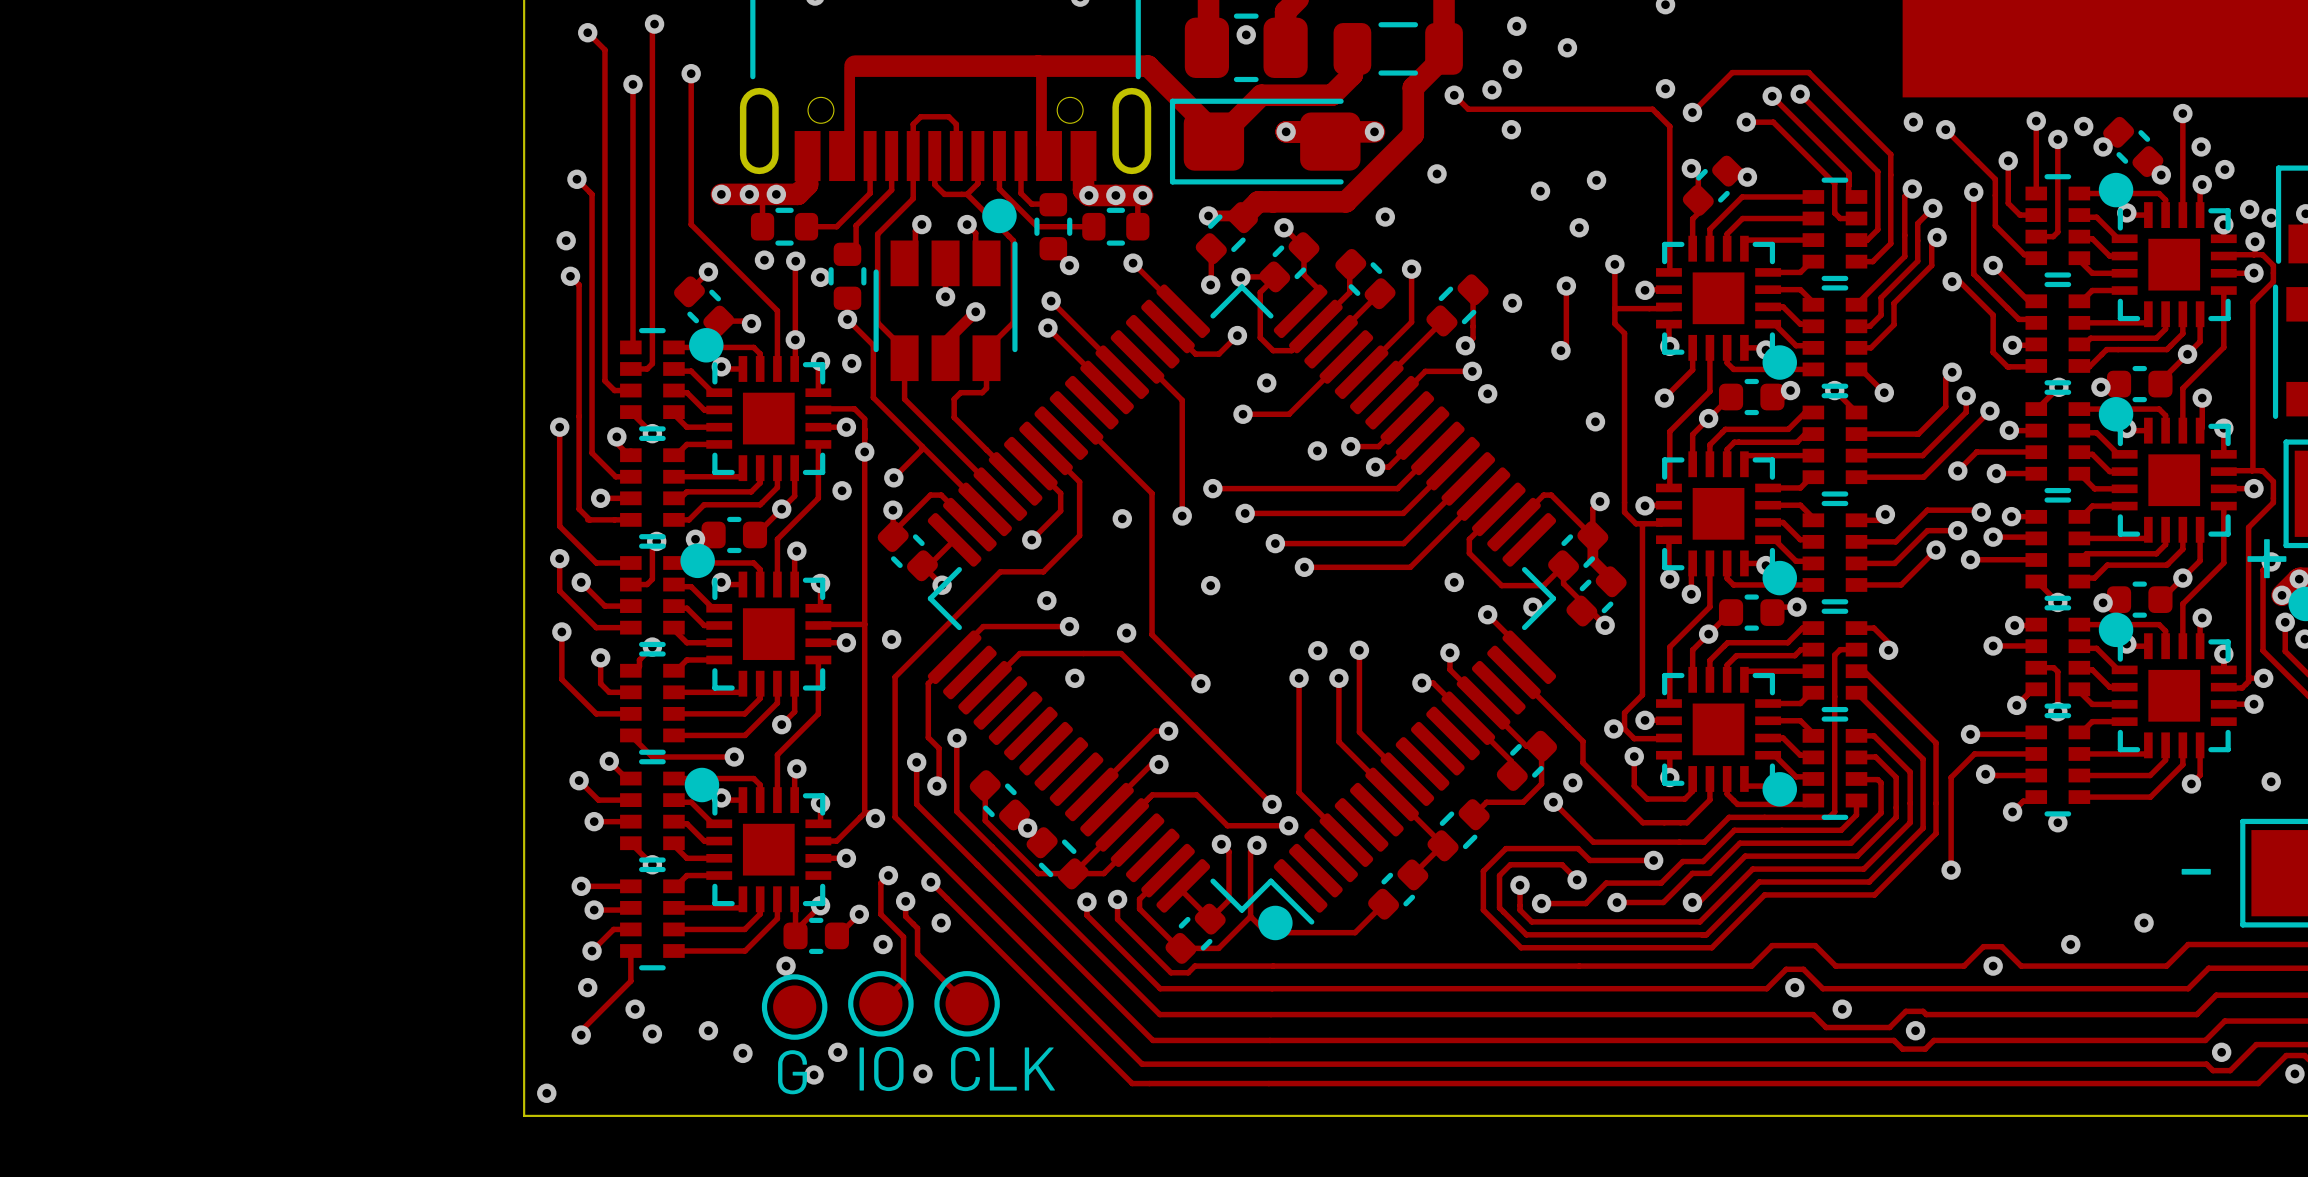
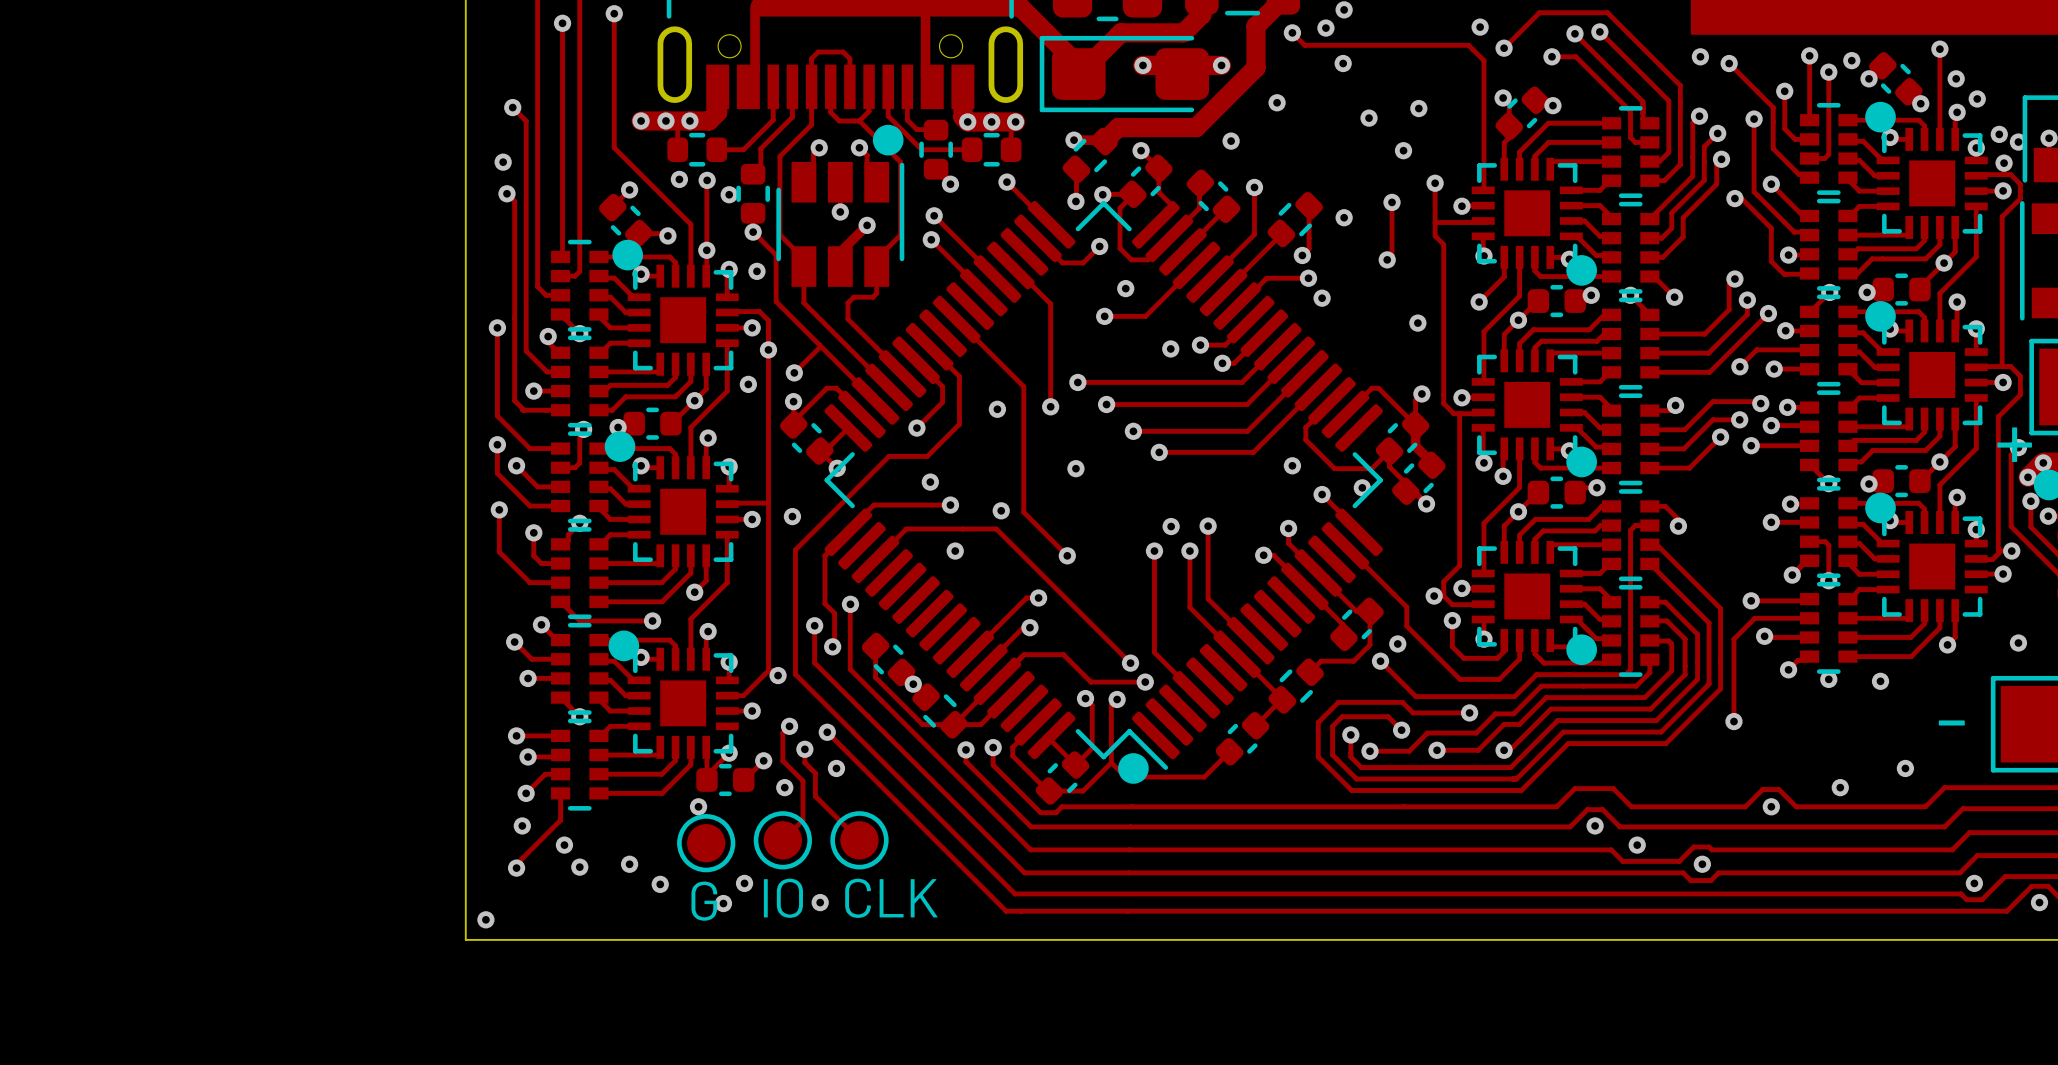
via: none -> (1880, 681)

